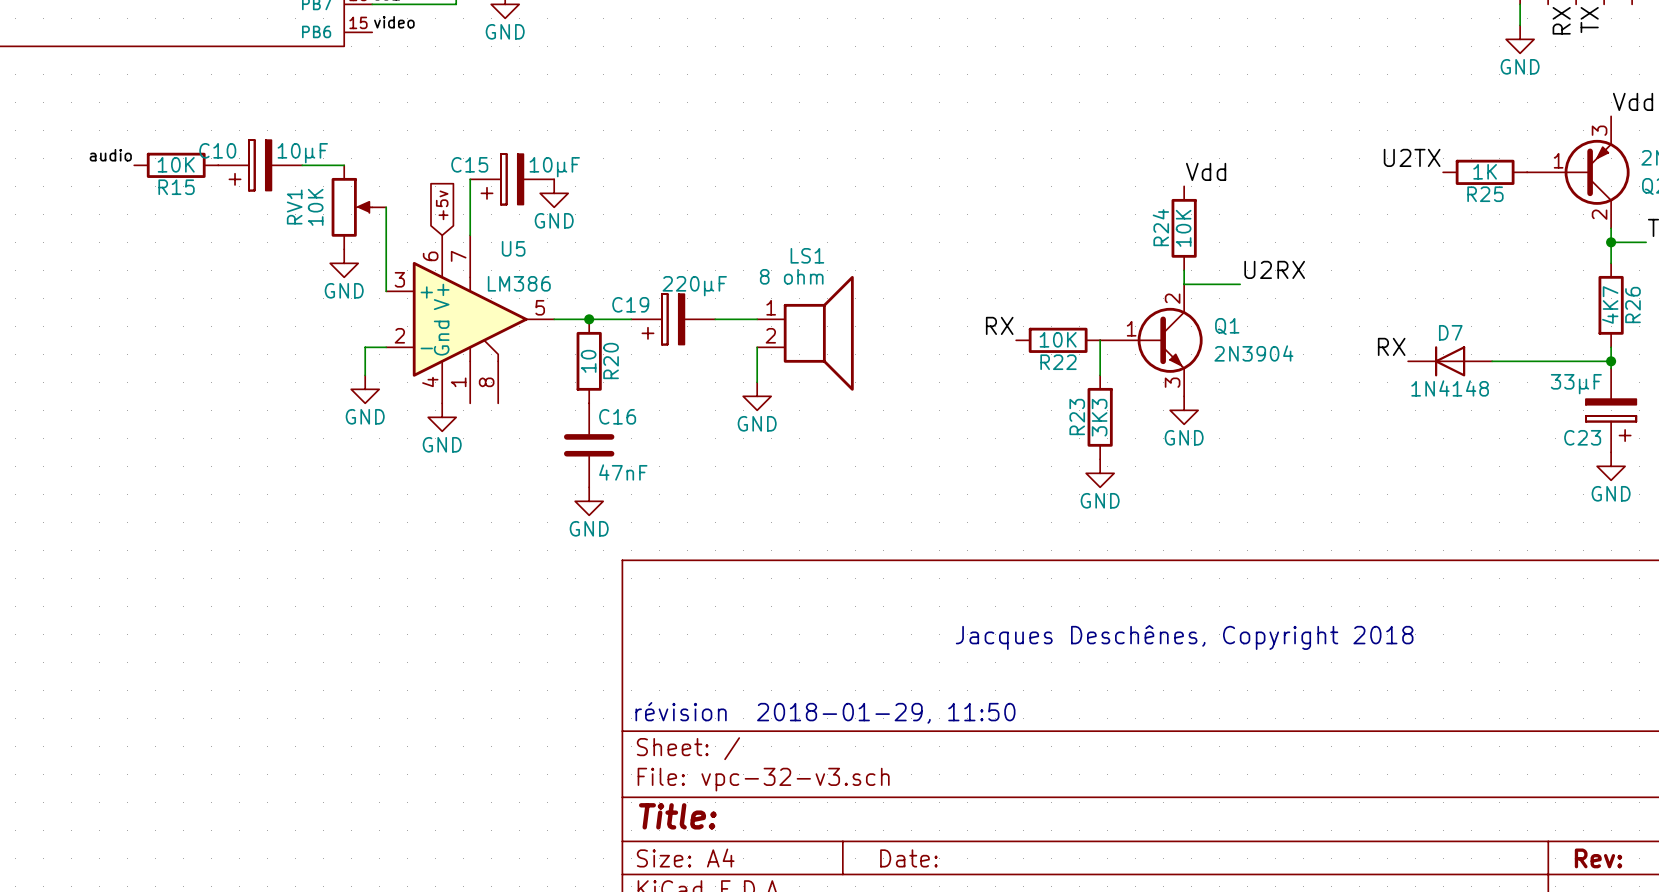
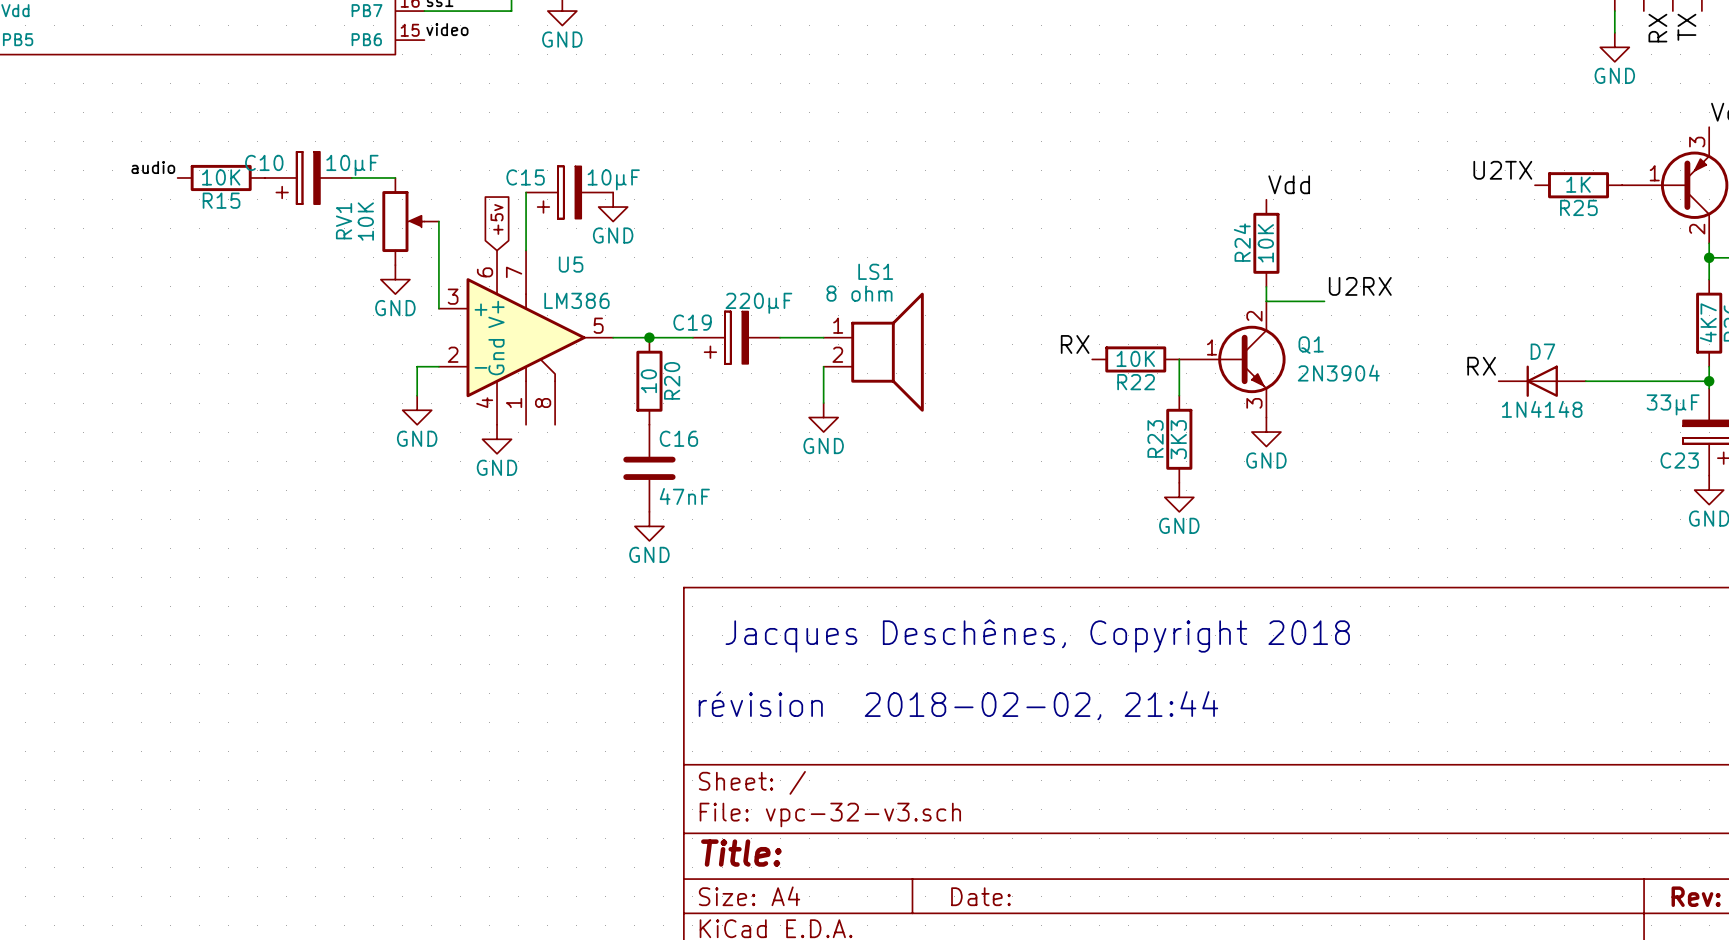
text: none -> Jacques Deschênes, Copyright 2018 (1037, 635)
text: Jacques Deschênes, Copyright 2018 (1184, 637) -> none
text: révision 2018-01-29, 11:50 (825, 712) -> révision 2018-02-02, 21:44 (958, 705)

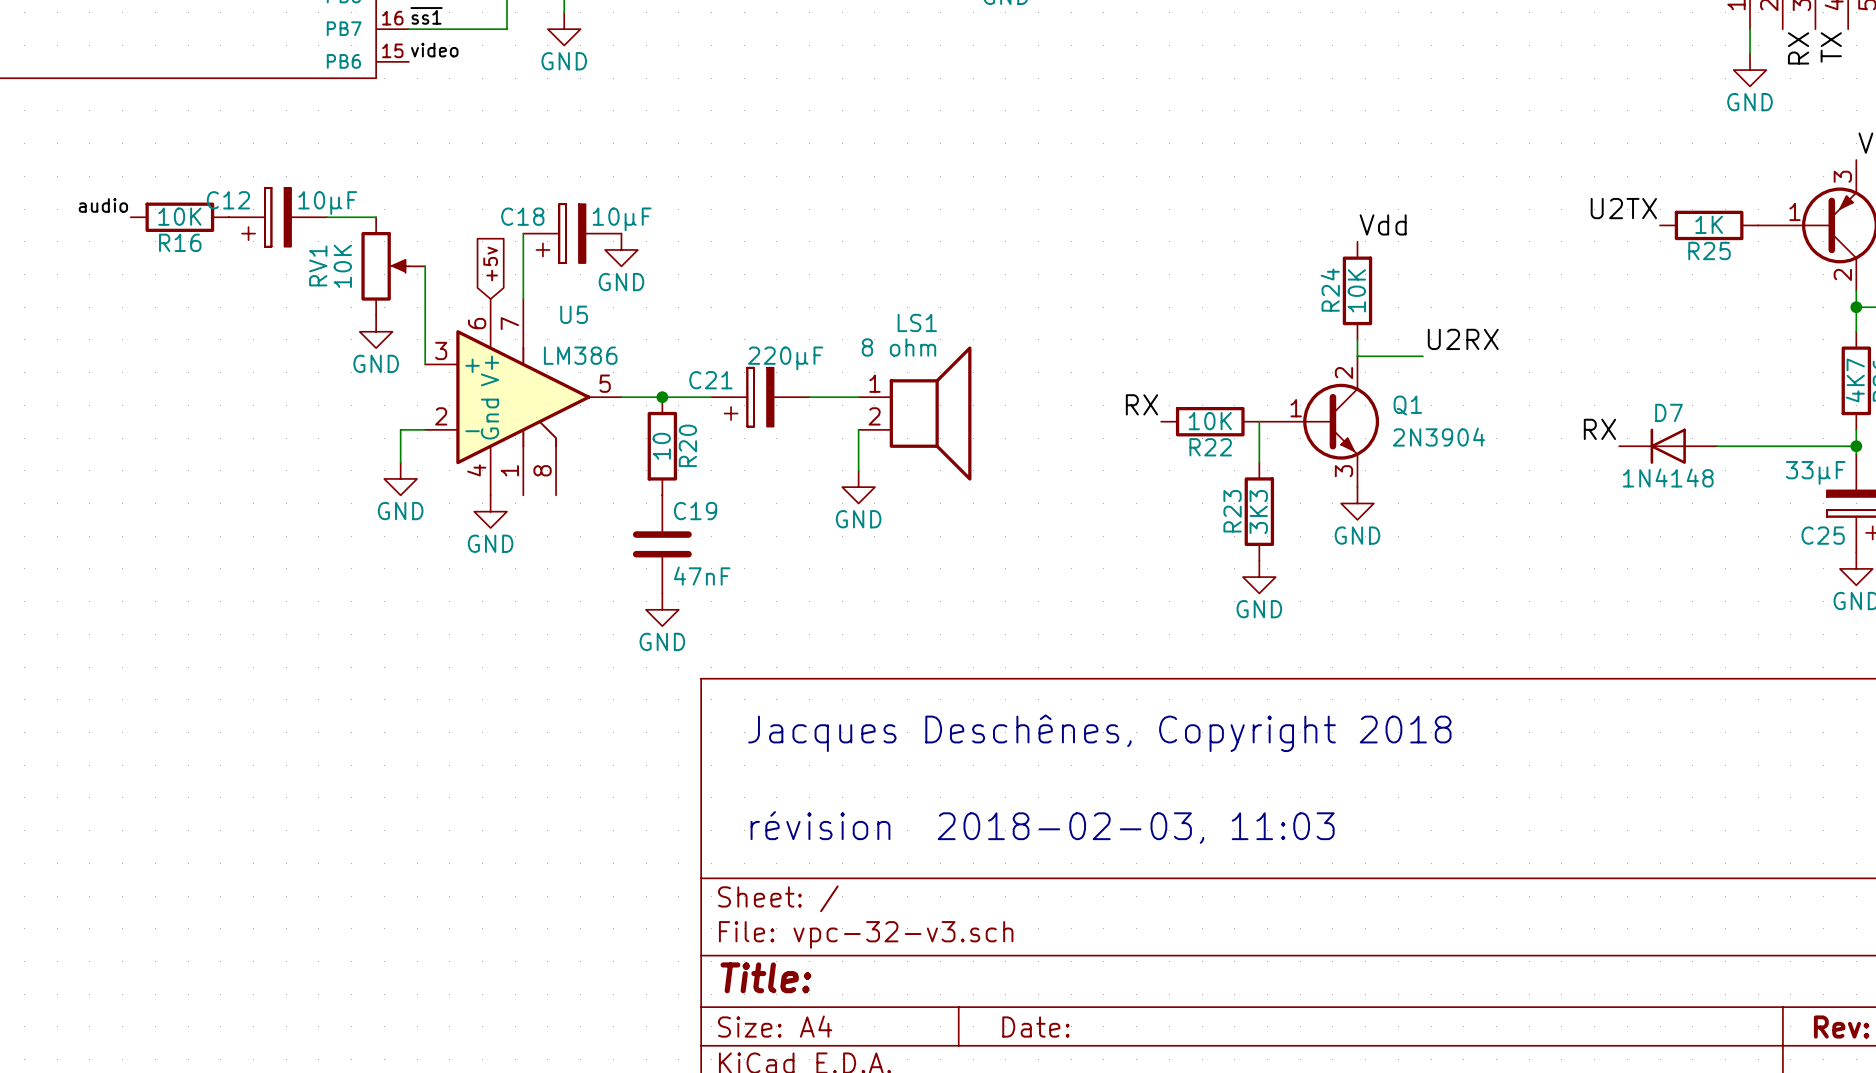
C10 name: C10 (264, 162) -> C12 (228, 200)
C15 name: C15 (525, 177) -> C18 (522, 216)
R15 name: R15 (221, 200) -> R16 (180, 242)
C19 name: C19 (692, 322) -> C21 (710, 380)
C16 name: C16 (678, 438) -> C19 (695, 511)
C23 name: C23 (1679, 460) -> C25 (1823, 535)
text: révision 2018-02-02, 21:44 (958, 705) -> révision 2018-02-03, 11:03 (1042, 827)

